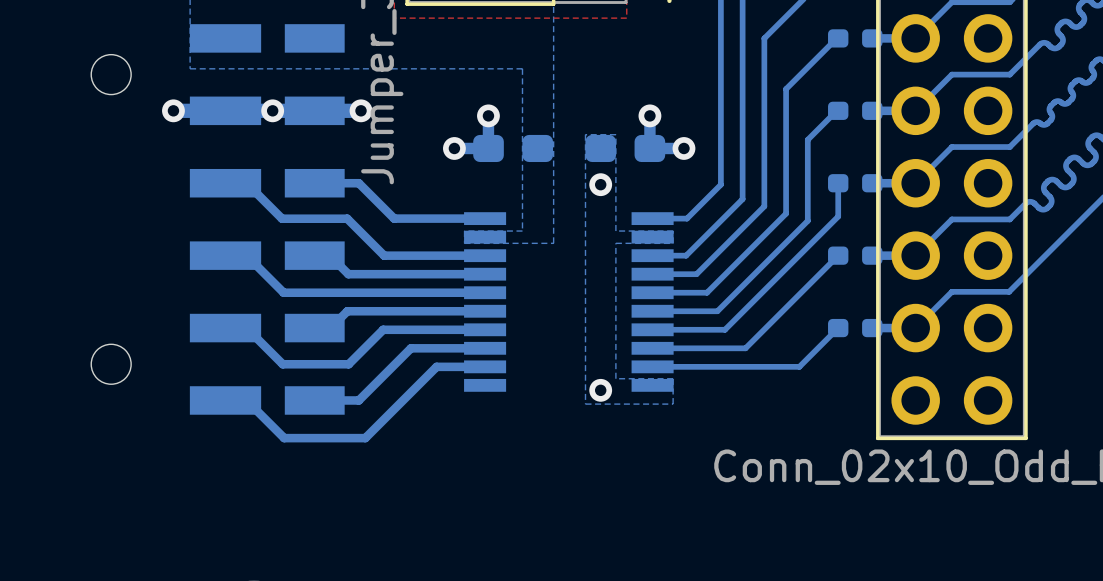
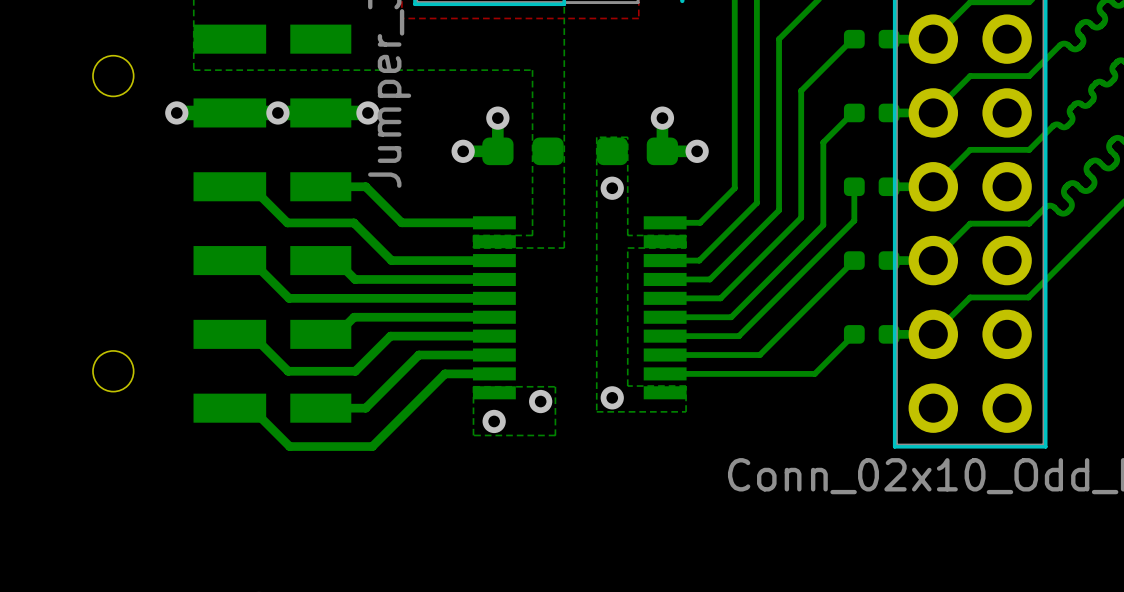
bottom zone outline: none -> (473, 386) (555, 386) (555, 435) (473, 435) (473, 386)
via: none -> (540, 401)
via: none -> (494, 421)

